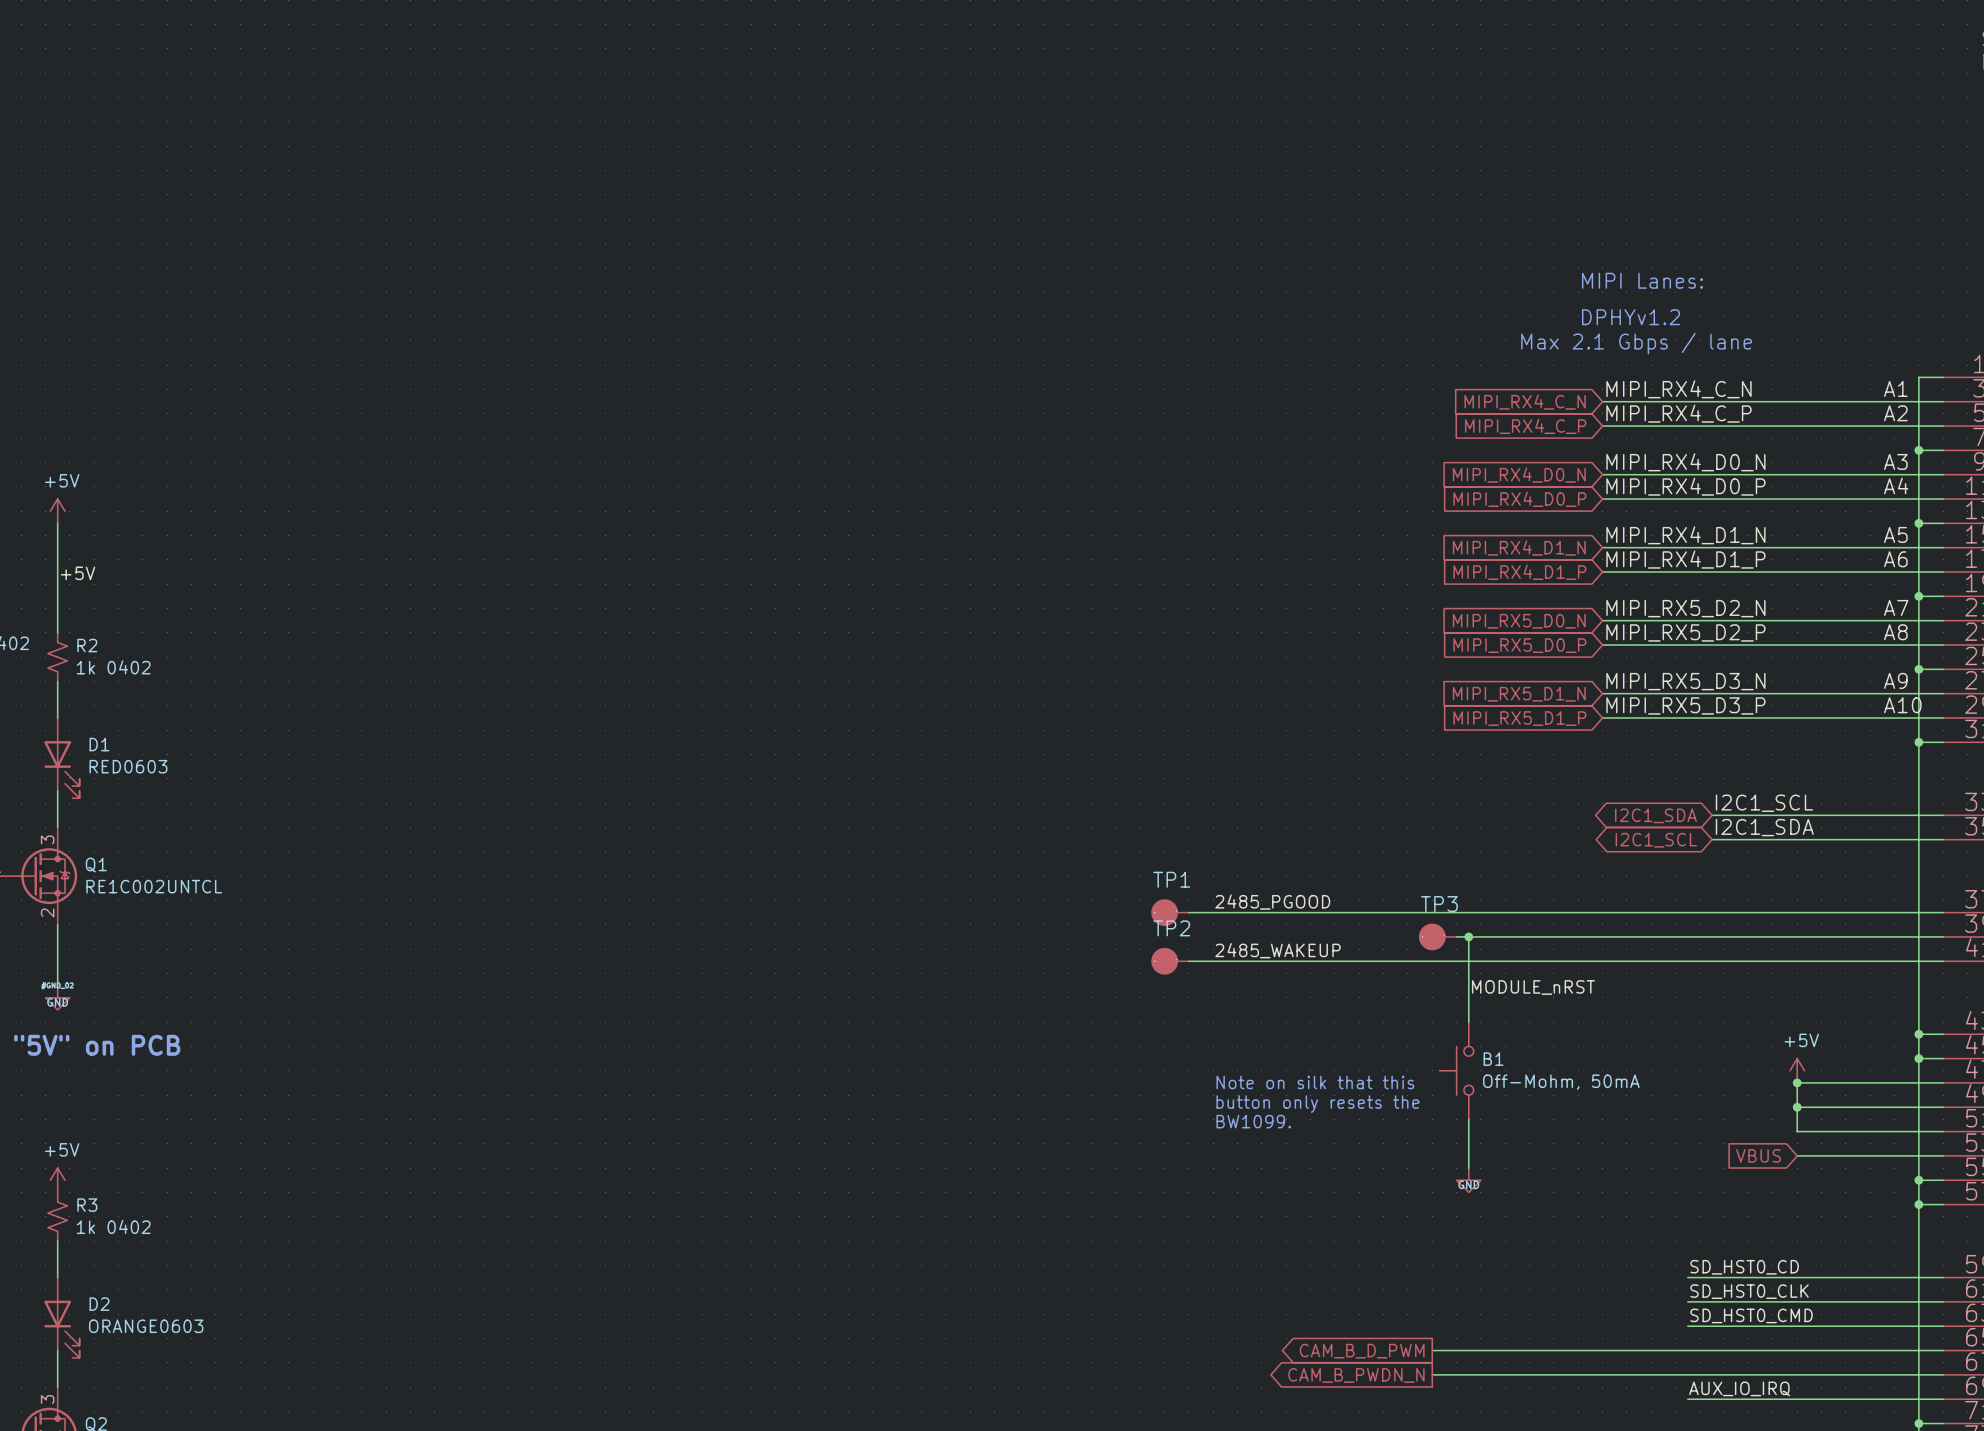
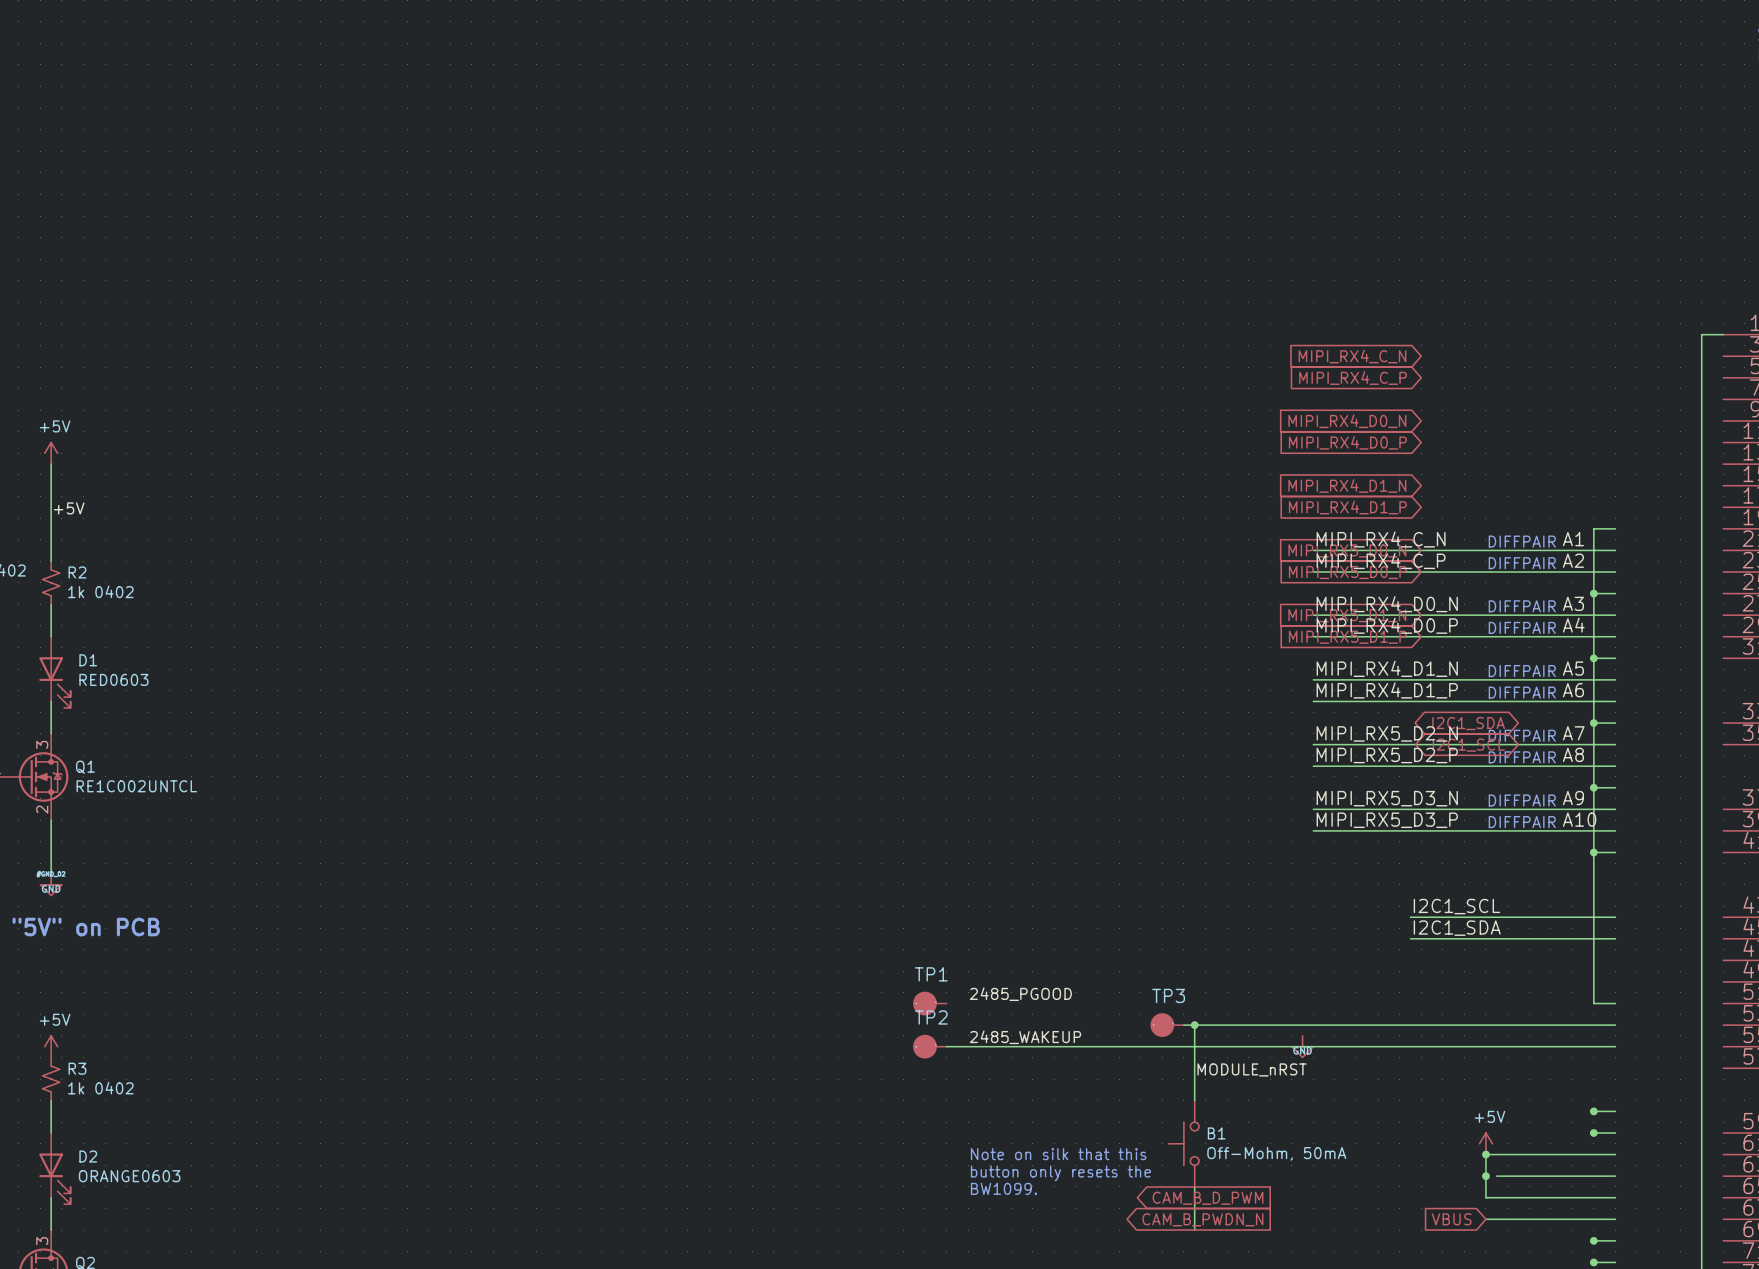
text: MIPI Lanes: (1642, 280) -> none
text: DPHYv1.2 (1631, 317) -> none
text: Max 2.1 Gbps / lane (1636, 343) -> none
label: A1 (1895, 388) -> none
label: MIPI_RX4_C_N (1678, 389) -> none
wire: (1602, 401) (1943, 401) -> none
label: MIPI_RX4_C_P (1678, 413) -> none
label: A2 (1895, 413) -> none
wire: (1602, 426) (1943, 426) -> none
wire: (1918, 450) (1943, 450) -> none
junction: (1918, 450) -> none
label: A3 (1895, 461) -> none
label: MIPI_RX4_D0_N (1685, 462) -> none
wire: (1602, 474) (1943, 474) -> none
label: A4 (1896, 485) -> none
label: MIPI_RX4_D0_P (1685, 486) -> none
wire: (1602, 499) (1943, 499) -> none
wire: (1918, 523) (1943, 523) -> (1593, 593) (1615, 593)
junction: (1918, 523) -> none
label: A5 (1895, 534) -> none
label: MIPI_RX4_D1_N (1685, 535) -> none
wire: (1602, 547) (1943, 547) -> none
label: MIPI_RX4_D1_P (1685, 559) -> none
label: A6 (1895, 559) -> none
wire: (1602, 572) (1943, 572) -> (1313, 679) (1615, 679)
wire: (1918, 596) (1943, 596) -> (1593, 658) (1615, 658)
junction: (1918, 596) -> none
label: none -> A1 (1573, 539)
label: A7 (1896, 607) -> none
label: none -> MIPI_RX4_C_N (1381, 539)
label: MIPI_RX5_D2_N (1685, 608) -> none
text: none -> DIFFPAIR (1522, 541)
wire: none -> (1313, 550) (1421, 550)
wire: (1821, 620) (1943, 620) -> none
label: none -> MIPI_RX4_C_P (1381, 561)
label: MIPI_RX5_D2_P (1685, 632) -> none
label: none -> A2 (1573, 560)
label: A8 (1895, 632) -> none
text: none -> DIFFPAIR (1522, 563)
wire: none -> (1313, 572) (1421, 572)
wire: (1821, 645) (1943, 645) -> none
junction: none -> (1593, 593)
wire: (1918, 669) (1943, 669) -> none
junction: (1918, 669) -> none
label: none -> A3 (1573, 603)
label: A9 (1895, 680) -> none
label: none -> MIPI_RX4_D0_N (1387, 604)
label: MIPI_RX5_D3_N (1685, 681) -> none
text: none -> DIFFPAIR (1522, 606)
wire: none -> (1313, 615) (1421, 615)
wire: (1821, 693) (1943, 693) -> none
label: none -> A4 (1573, 625)
label: none -> MIPI_RX4_D0_P (1387, 625)
label: MIPI_RX5_D3_P (1685, 705) -> none
label: A10 (1902, 705) -> none
text: none -> DIFFPAIR (1522, 627)
wire: none -> (1313, 636) (1421, 636)
wire: (1821, 717) (1943, 717) -> none
junction: none -> (1593, 658)
wire: (1918, 742) (1943, 742) -> (1593, 787) (1615, 787)
junction: (1918, 742) -> none
label: none -> A5 (1573, 668)
label: none -> MIPI_RX4_D1_N (1387, 668)
text: none -> DIFFPAIR (1522, 671)
label: none -> MIPI_RX4_D1_P (1387, 690)
label: none -> A6 (1573, 690)
text: none -> DIFFPAIR (1522, 692)
wire: none -> (1313, 701) (1615, 701)
label: I2C1_SCL (1764, 803) -> none
wire: (1712, 815) (1797, 815) -> none
junction: none -> (1593, 723)
wire: (1821, 815) (1943, 815) -> none
label: none -> A7 (1573, 733)
label: none -> MIPI_RX5_D2_N (1387, 733)
label: I2C1_SDA (1764, 827) -> none
text: none -> DIFFPAIR (1522, 735)
wire: none -> (1313, 744) (1518, 744)
wire: (1821, 839) (1943, 839) -> none
label: none -> MIPI_RX5_D2_P (1387, 755)
label: none -> A8 (1573, 754)
text: none -> DIFFPAIR (1522, 757)
wire: none -> (1313, 766) (1615, 766)
junction: none -> (1593, 787)
label: none -> A9 (1573, 798)
label: none -> MIPI_RX5_D3_N (1387, 798)
label: 2485_PGOOD (1272, 902) -> none
text: none -> DIFFPAIR (1522, 800)
TP1 position: (1170, 912) -> (929, 1003)
wire: (1188, 912) (1480, 912) -> none
wire: (1821, 912) (1943, 912) -> none
label: none -> MIPI_RX5_D3_P (1387, 820)
label: none -> A10 (1579, 819)
text: none -> DIFFPAIR (1522, 822)
TP3 position: (1437, 936) -> (1167, 1025)
wire: (1456, 936) (1480, 936) -> none
wire: (1468, 936) (1468, 1022) -> none
junction: (1468, 936) -> none
wire: (1821, 936) (1943, 936) -> none
label: 2485_WAKEUP (1278, 950) -> none
TP2 position: (1170, 961) -> (929, 1046)
wire: (1188, 961) (1797, 961) -> none
junction: none -> (1593, 852)
wire: (1821, 961) (1943, 961) -> none
label: MODULE_nRST (1533, 987) -> none
label: none -> I2C1_SCL (1456, 906)
wire: none -> (1410, 917) (1615, 917)
wire: (1918, 1034) (1943, 1034) -> none
junction: (1918, 1034) -> none
label: none -> I2C1_SDA (1457, 928)
wire: none -> (1410, 938) (1615, 938)
wire: (1918, 1058) (1943, 1058) -> none
junction: (1918, 1058) -> none
B1 position: (1456, 1070) -> (1183, 1143)
power symbol: +5V (1797, 1070) -> none
text: Note on silk that this (1315, 1082) -> none
wire: (1797, 1082) (1943, 1082) -> (1593, 960) (1593, 528) (1615, 528)
junction: (1797, 1082) -> none
text: button only resets the (1317, 1104) -> none
wire: (1797, 1107) (1943, 1107) -> none
junction: (1797, 1107) -> none
wire: (1468, 1119) (1468, 1168) -> none
label: none -> 2485_PGOOD (1020, 994)
text: BW1099. (1253, 1121) -> none
wire: (1821, 1131) (1943, 1131) -> none
wire: none -> (1183, 1025) (1593, 1025)
wire: none -> (1194, 1025) (1194, 1100)
junction: none -> (1194, 1025)
global label: VBUS (1758, 1155) -> none
wire: (1821, 1155) (1943, 1155) -> none
label: none -> 2485_WAKEUP (1025, 1037)
wire: none -> (946, 1046) (1615, 1046)
wire: (1918, 1180) (1943, 1180) -> (1593, 1111) (1615, 1111)
junction: (1918, 1180) -> none
wire: (1918, 1204) (1943, 1204) -> none
junction: (1918, 1204) -> none
label: none -> MODULE_nRST (1252, 1069)
junction: none -> (1593, 1111)
label: SD_HST0_CD (1744, 1267) -> none
wire: (1687, 1277) (1797, 1277) -> none
junction: none -> (1593, 1132)
wire: (1821, 1277) (1943, 1277) -> none
power symbol: none -> +5V (1485, 1143)
label: SD_HST0_CLK (1749, 1291) -> none
text: none -> Note on silk that this (1058, 1154)
junction: none -> (1485, 1154)
wire: (1821, 1301) (1943, 1301) -> none
label: SD_HST0_CMD (1751, 1315) -> none
text: none -> button only resets the (1060, 1173)
junction: none -> (1485, 1176)
wire: (1821, 1326) (1943, 1326) -> none
wire: none -> (1194, 1186) (1194, 1230)
text: none -> BW1099. (1003, 1188)
wire: (1432, 1350) (1675, 1350) -> (1496, 1154) (1485, 1154) (1485, 1197)
wire: (1821, 1350) (1943, 1350) -> none
wire: (1432, 1374) (1675, 1374) -> none
global label: none -> VBUS (1451, 1219)
wire: (1821, 1374) (1943, 1374) -> none
label: AUX_IO_IRQ (1739, 1388) -> none
wire: (1687, 1399) (1797, 1399) -> none
junction: none -> (1593, 1240)
wire: (1821, 1399) (1943, 1399) -> none
junction: none -> (1593, 1262)
wire: (1918, 1423) (1943, 1423) -> (1593, 1262) (1615, 1262)
junction: (1918, 1423) -> none

